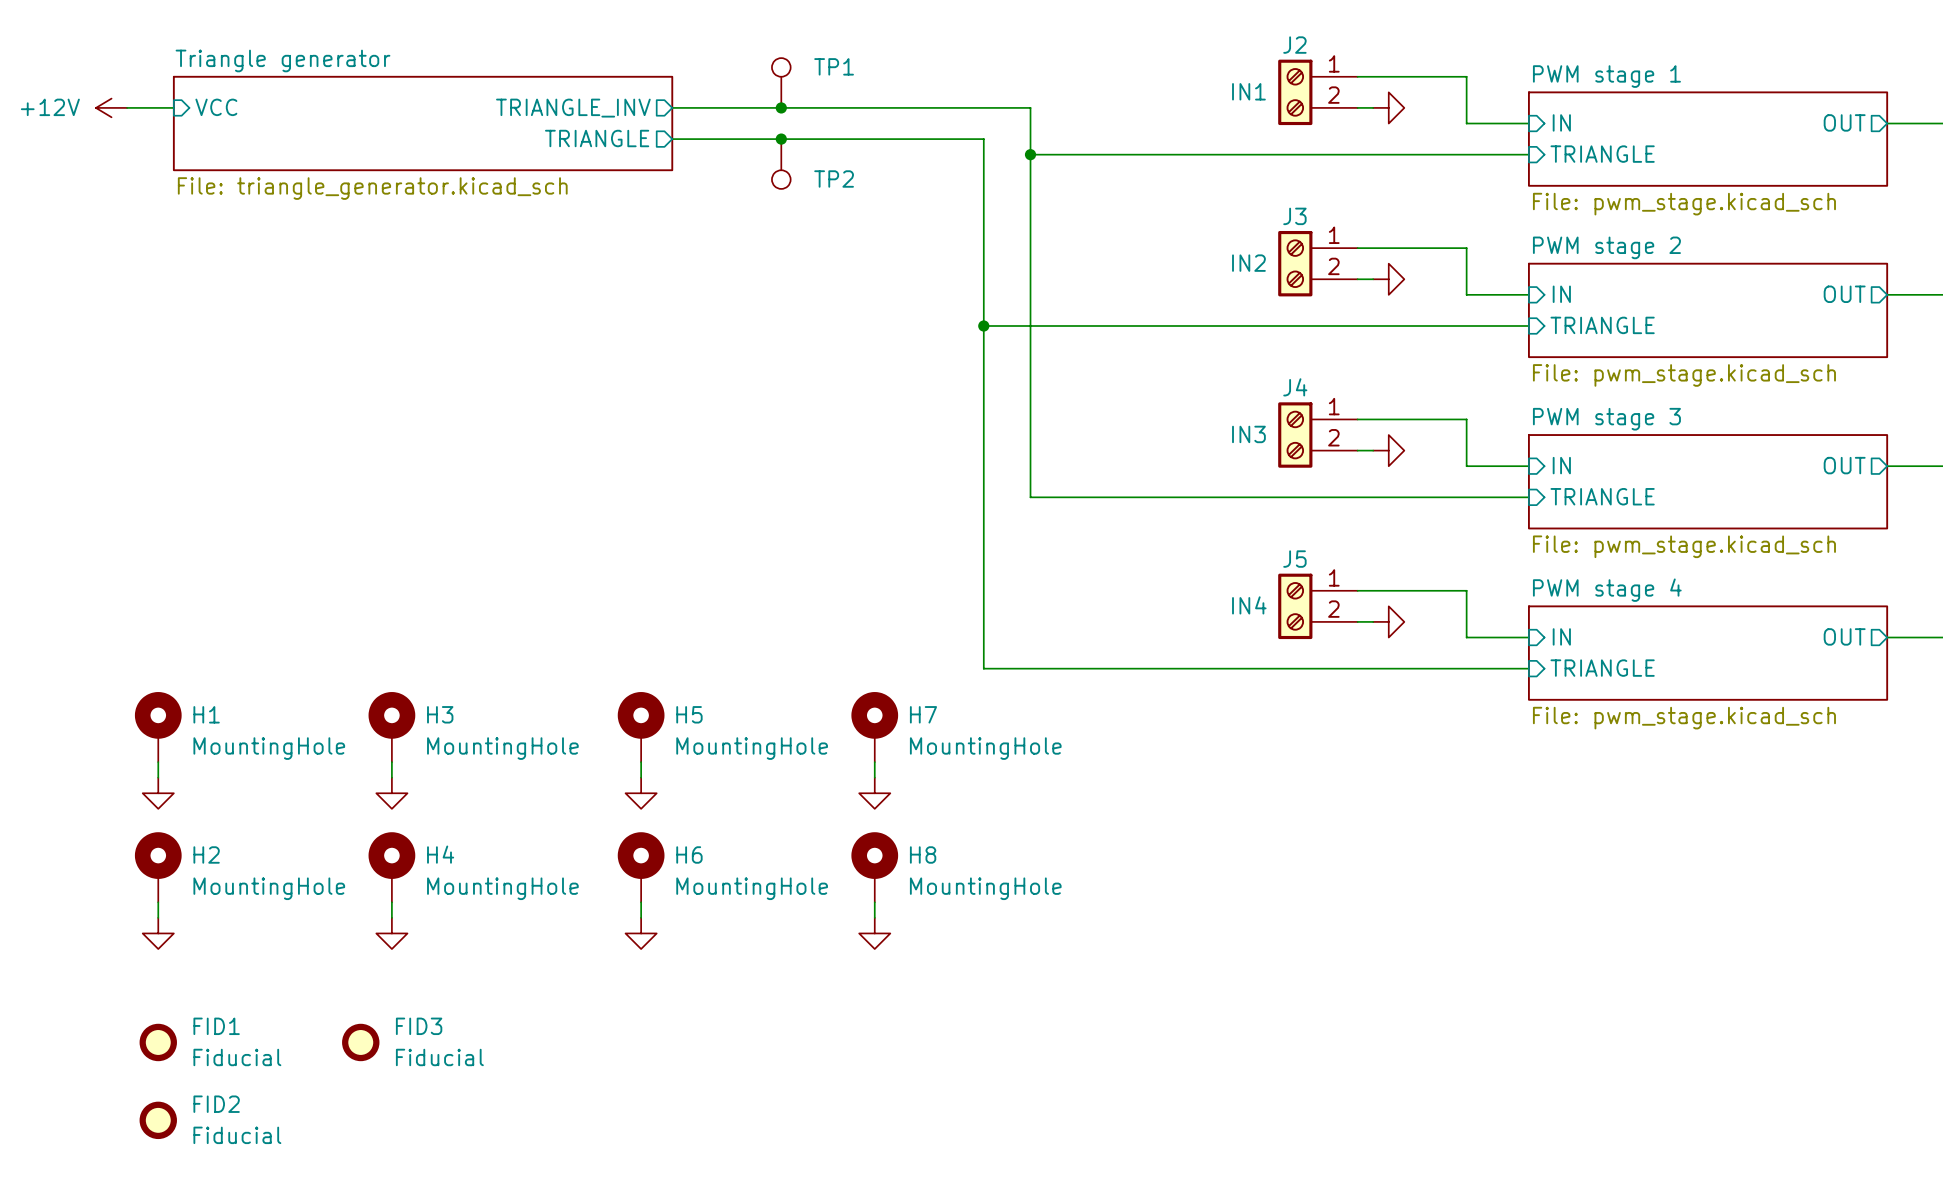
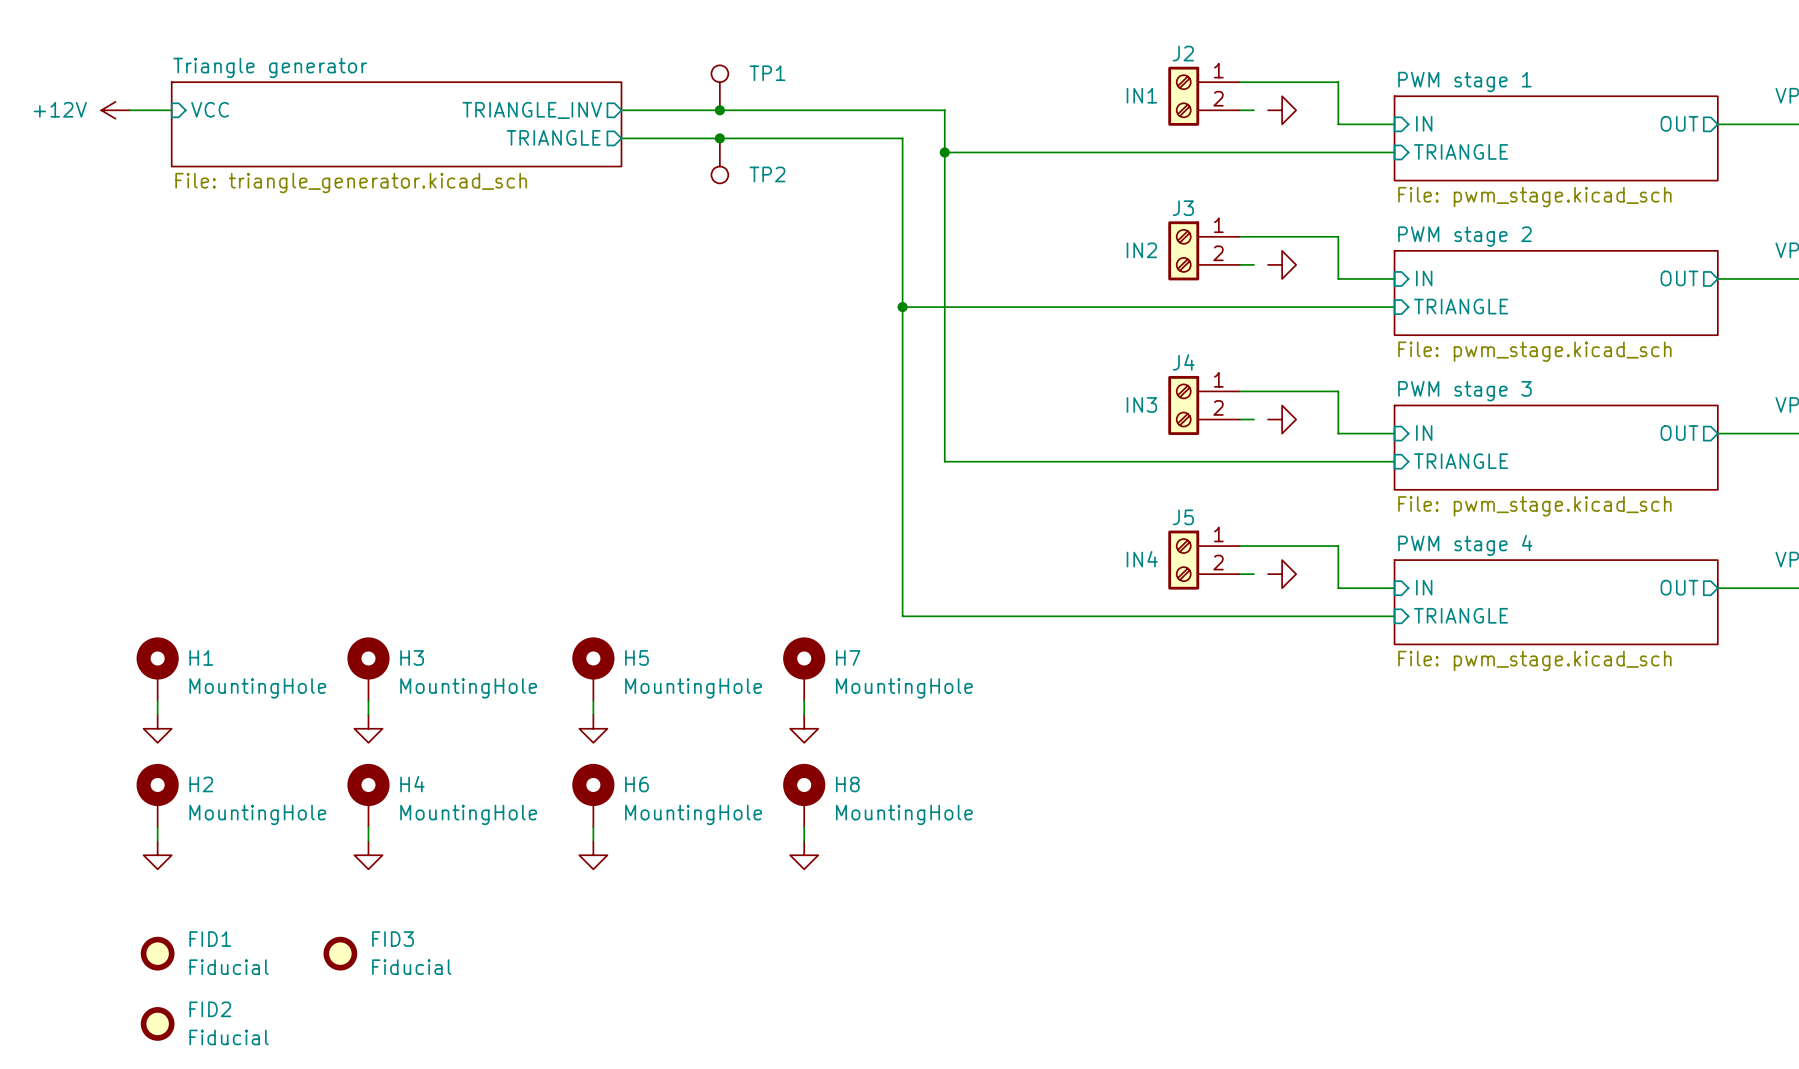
power symbol position: (1388, 107) -> (1282, 110)
power symbol position: (1388, 279) -> (1282, 264)
power symbol position: (1388, 450) -> (1282, 419)
power symbol position: (1388, 621) -> (1282, 574)

